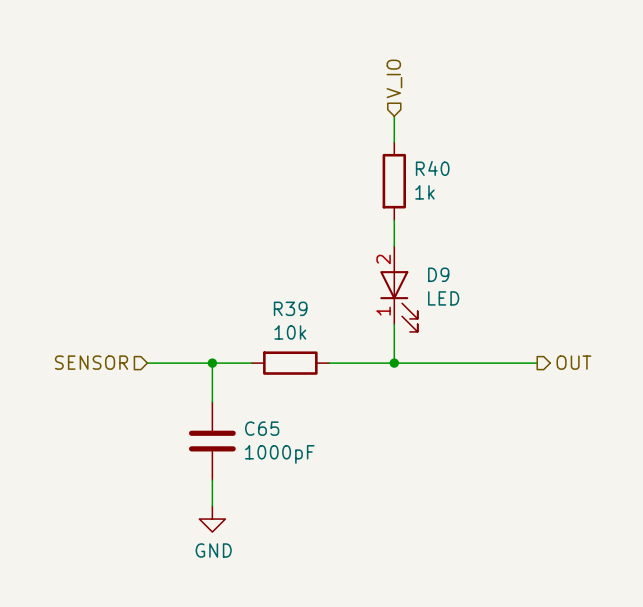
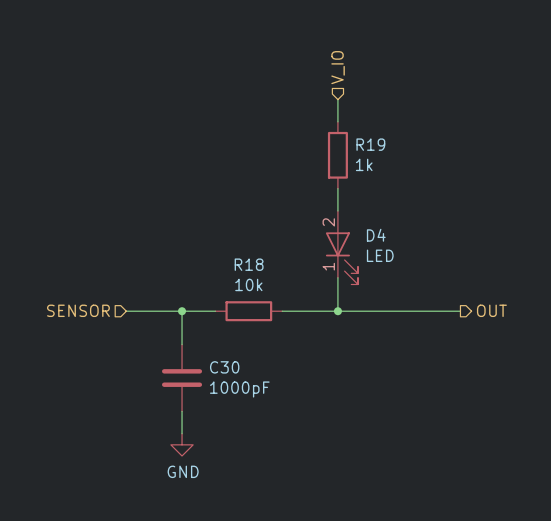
R40 name: R40 (432, 168) -> R19 (370, 144)
D9 name: D9 (438, 274) -> D4 (376, 235)
R39 name: R39 (290, 308) -> R18 (249, 264)
C65 name: C65 (262, 428) -> C30 (224, 367)

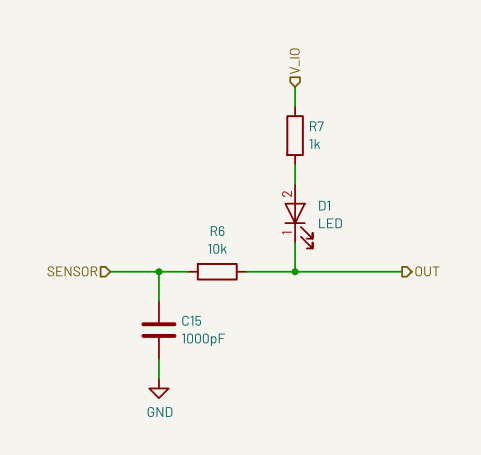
R19 name: R19 (370, 144) -> R7 (316, 126)
D4 name: D4 (376, 235) -> D1 (324, 205)
R18 name: R18 (249, 264) -> R6 (217, 231)
C30 name: C30 (224, 367) -> C15 (191, 320)

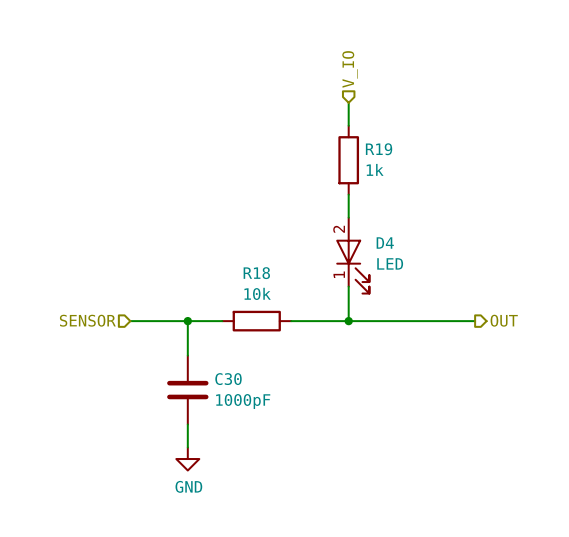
R7 name: R7 (316, 126) -> R19 (379, 149)
D1 name: D1 (324, 205) -> D4 (385, 243)
R6 name: R6 (217, 231) -> R18 (256, 273)
C15 name: C15 (191, 320) -> C30 (228, 379)

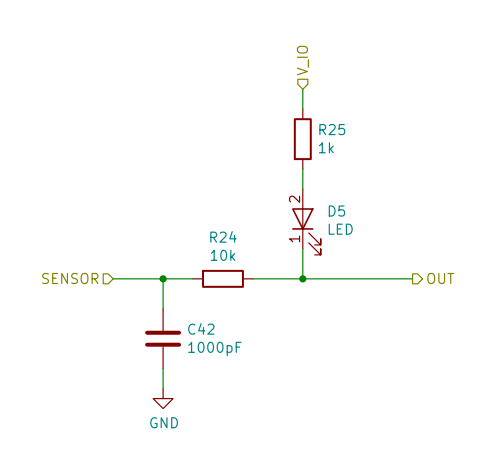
R19 name: R19 (379, 149) -> R25 (332, 129)
D4 name: D4 (385, 243) -> D5 (336, 211)
R18 name: R18 (256, 273) -> R24 (223, 236)
C30 name: C30 (228, 379) -> C42 (201, 328)

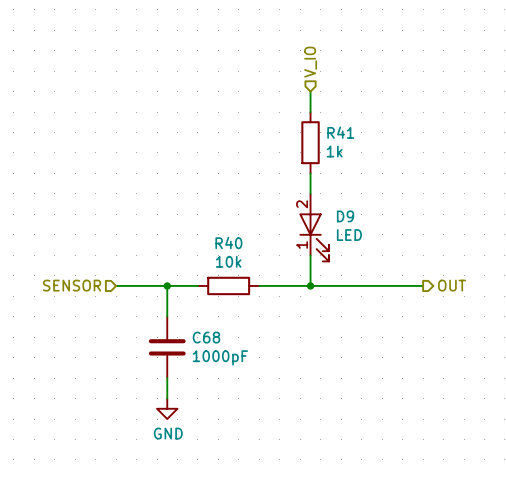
R25 name: R25 (332, 129) -> R41 (340, 132)
D5 name: D5 (336, 211) -> D9 (345, 216)
R24 name: R24 (223, 236) -> R40 (228, 242)
C42 name: C42 (201, 328) -> C68 (206, 337)

